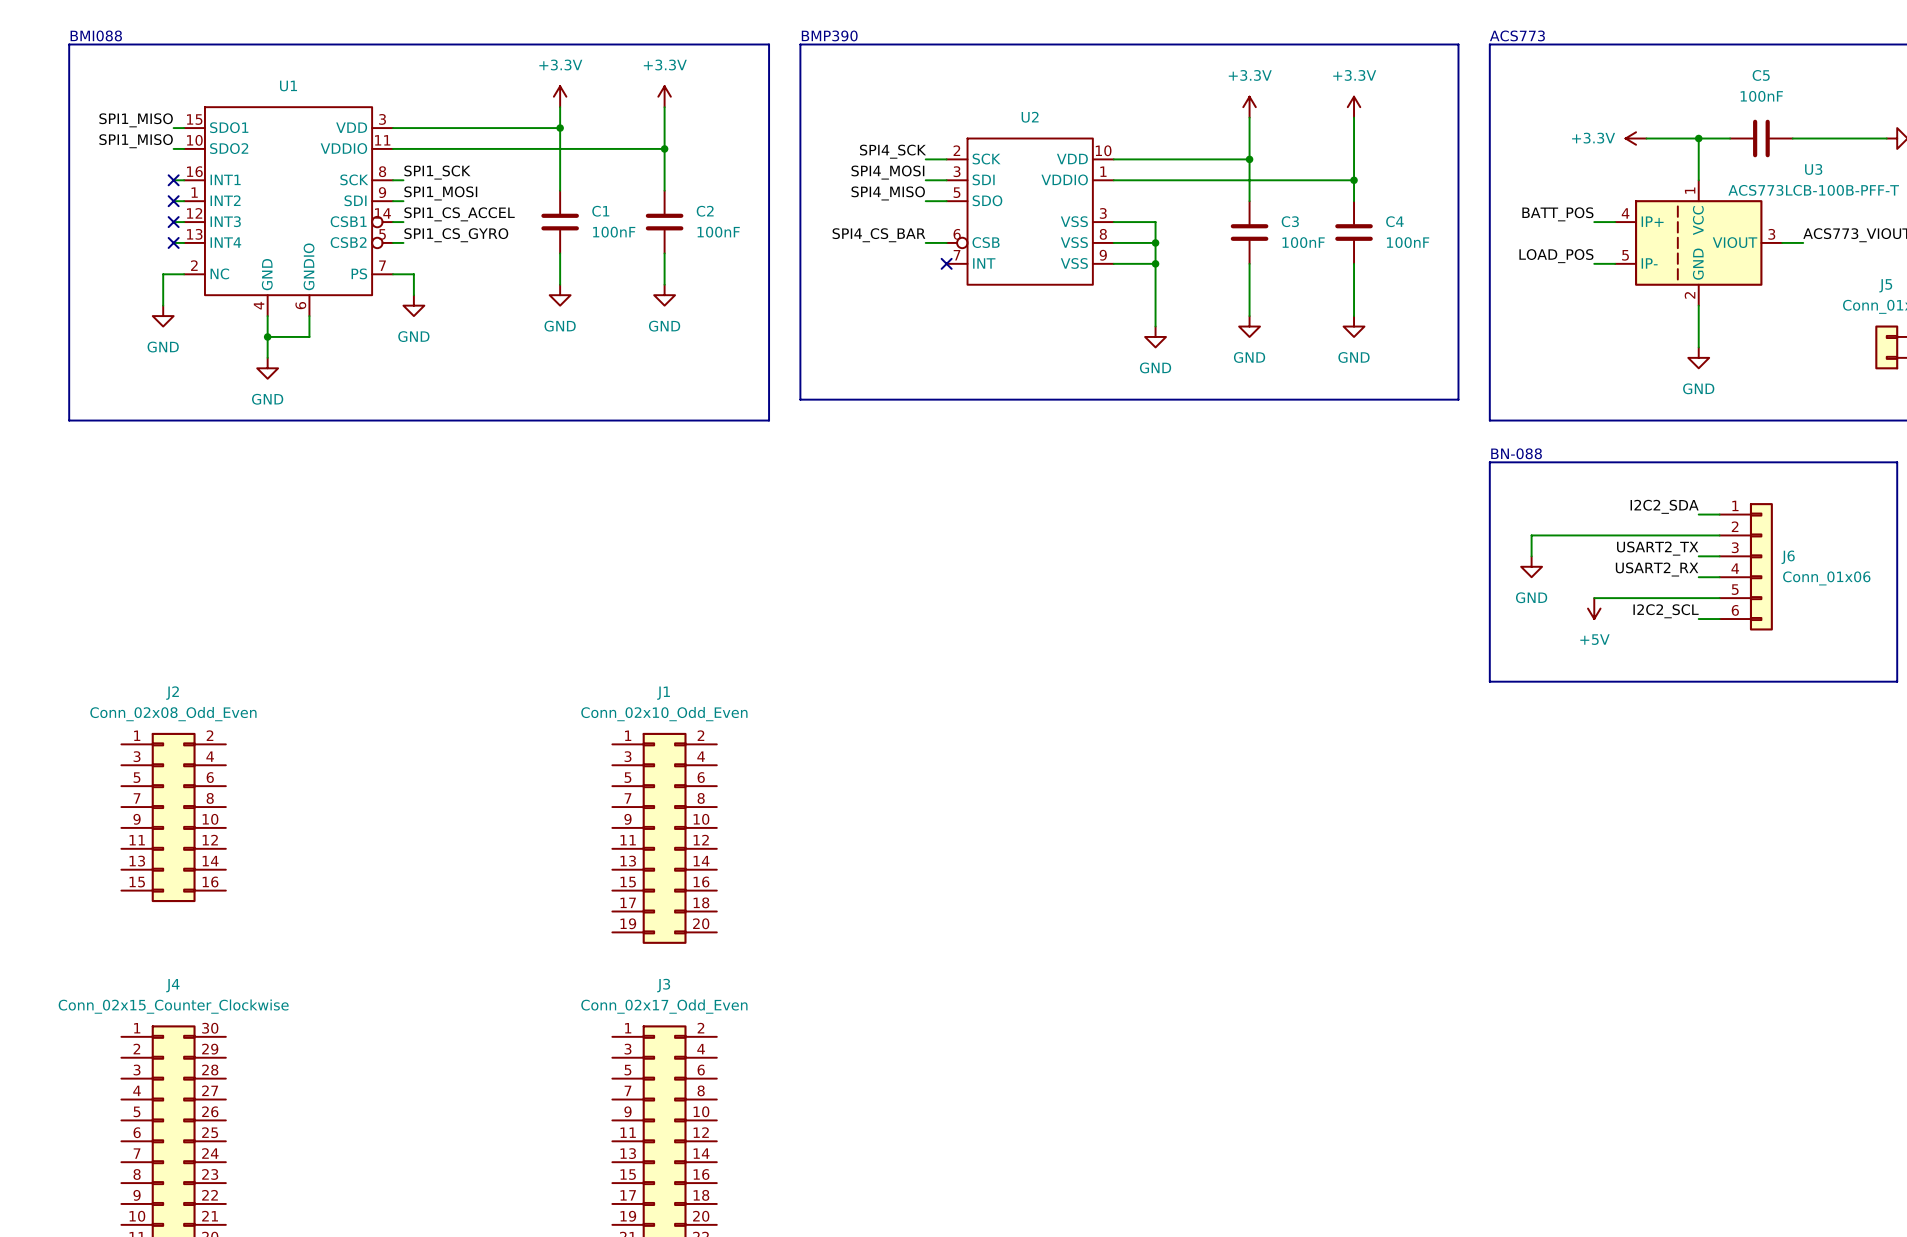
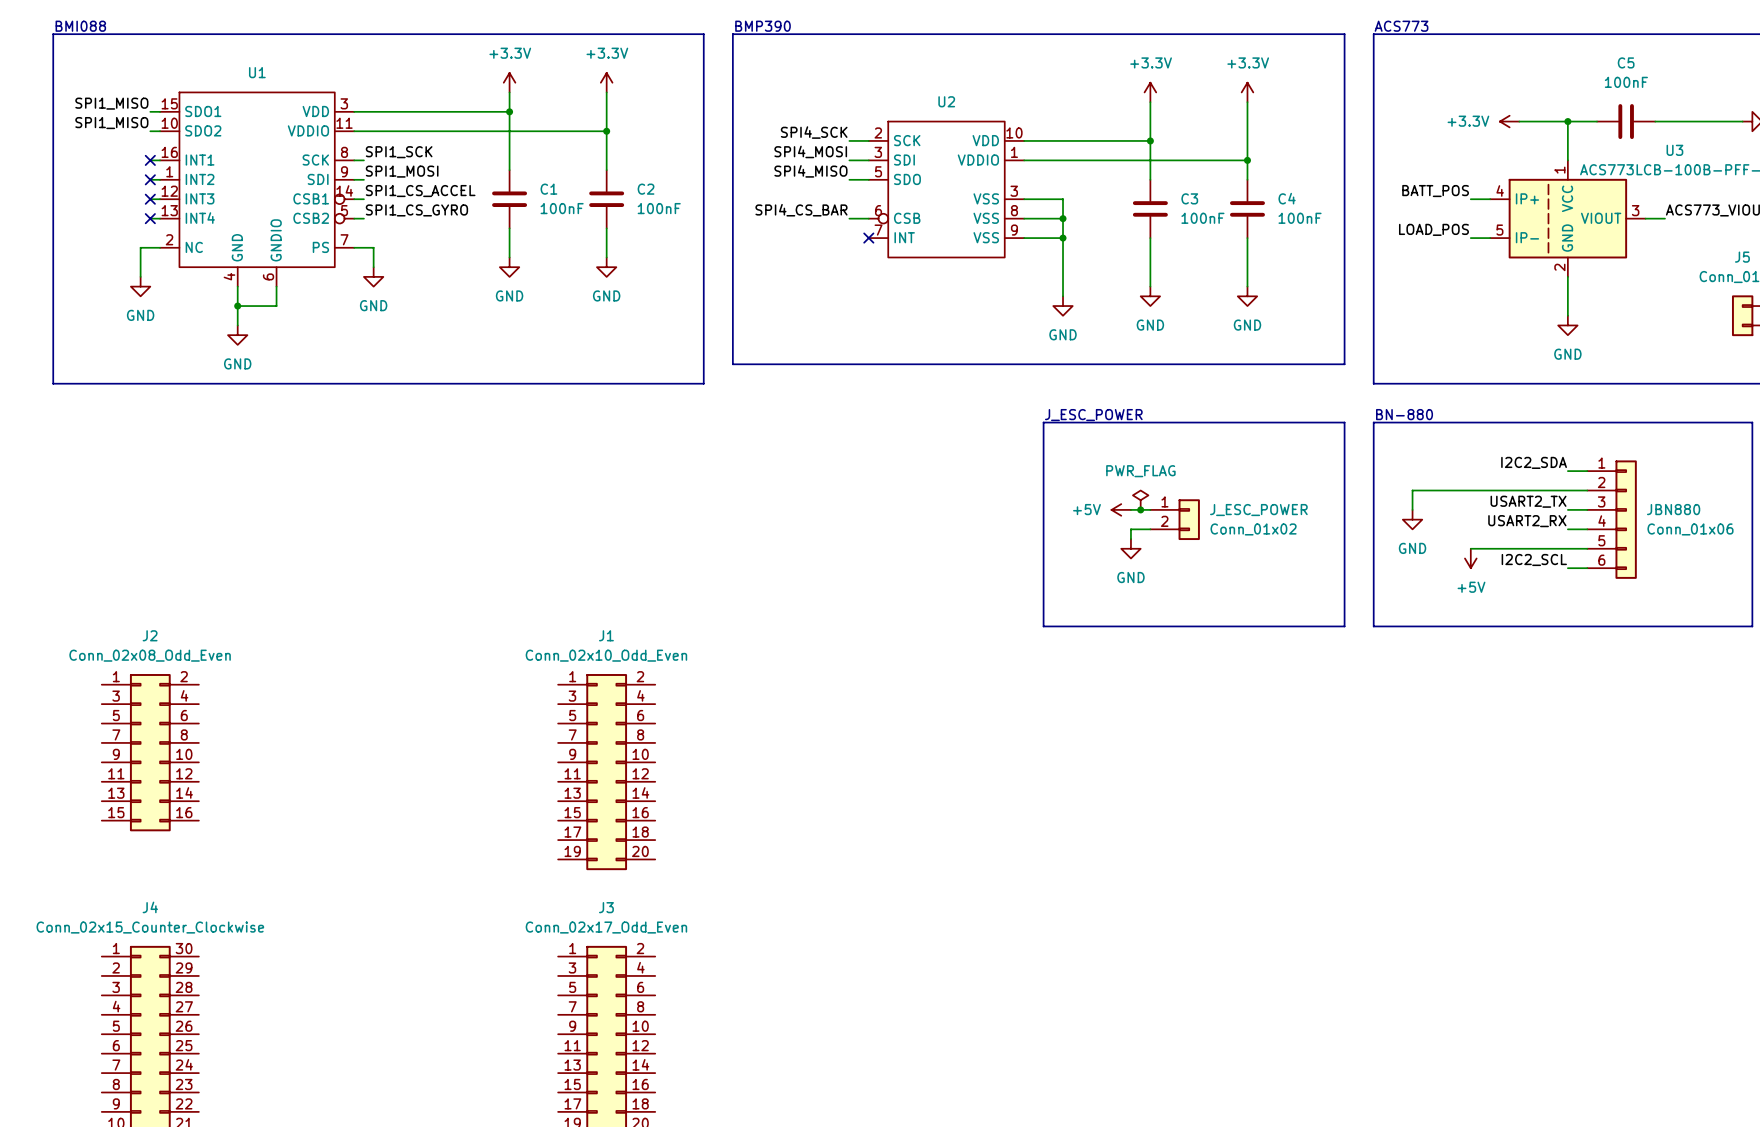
text: BN-088 (1516, 453) -> BN-880 (1404, 414)
text: none -> J_ESC_POWER (1093, 415)
line: none -> (1043, 422) (1344, 422) (1344, 626) (1043, 626) (1043, 422)
power symbol: none -> PWR_FLAG (1140, 500)
power symbol: none -> +5V (1121, 509)
wire: none -> (1130, 509) (1150, 509)
junction: none -> (1140, 509)
J6 name: J6 (1788, 557) -> JBN880 (1673, 509)
J_ESC_POWER: none -> Conn_01x02 (1175, 519)
wire: none -> (1150, 529) (1130, 529) (1130, 539)
power symbol: none -> GND (1130, 548)

